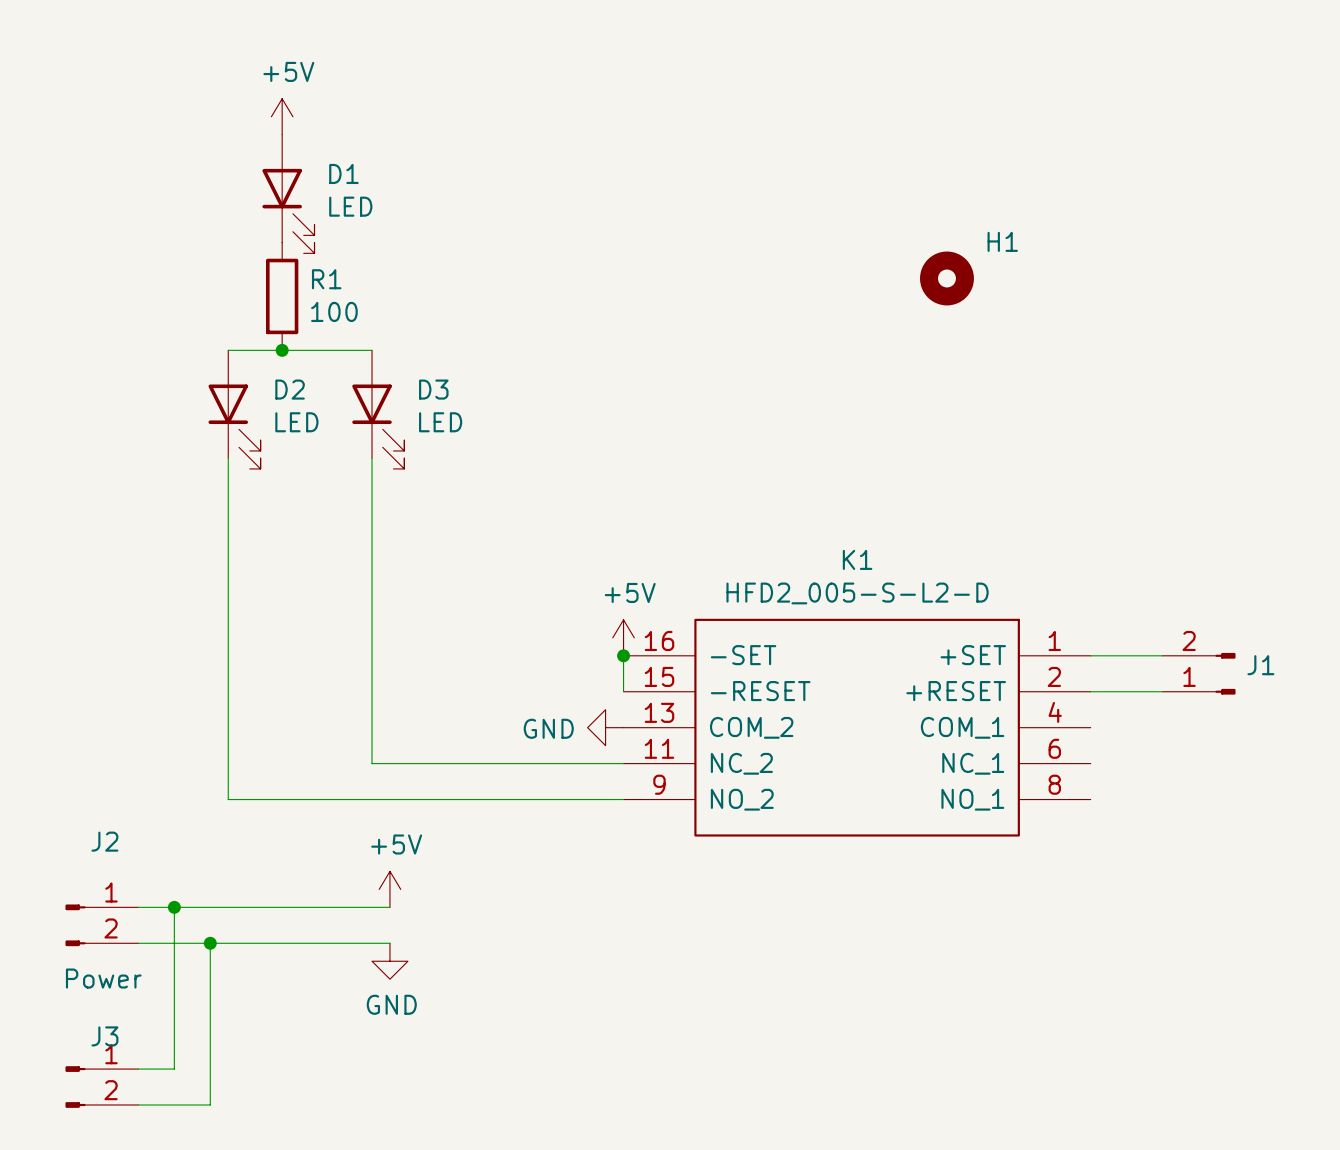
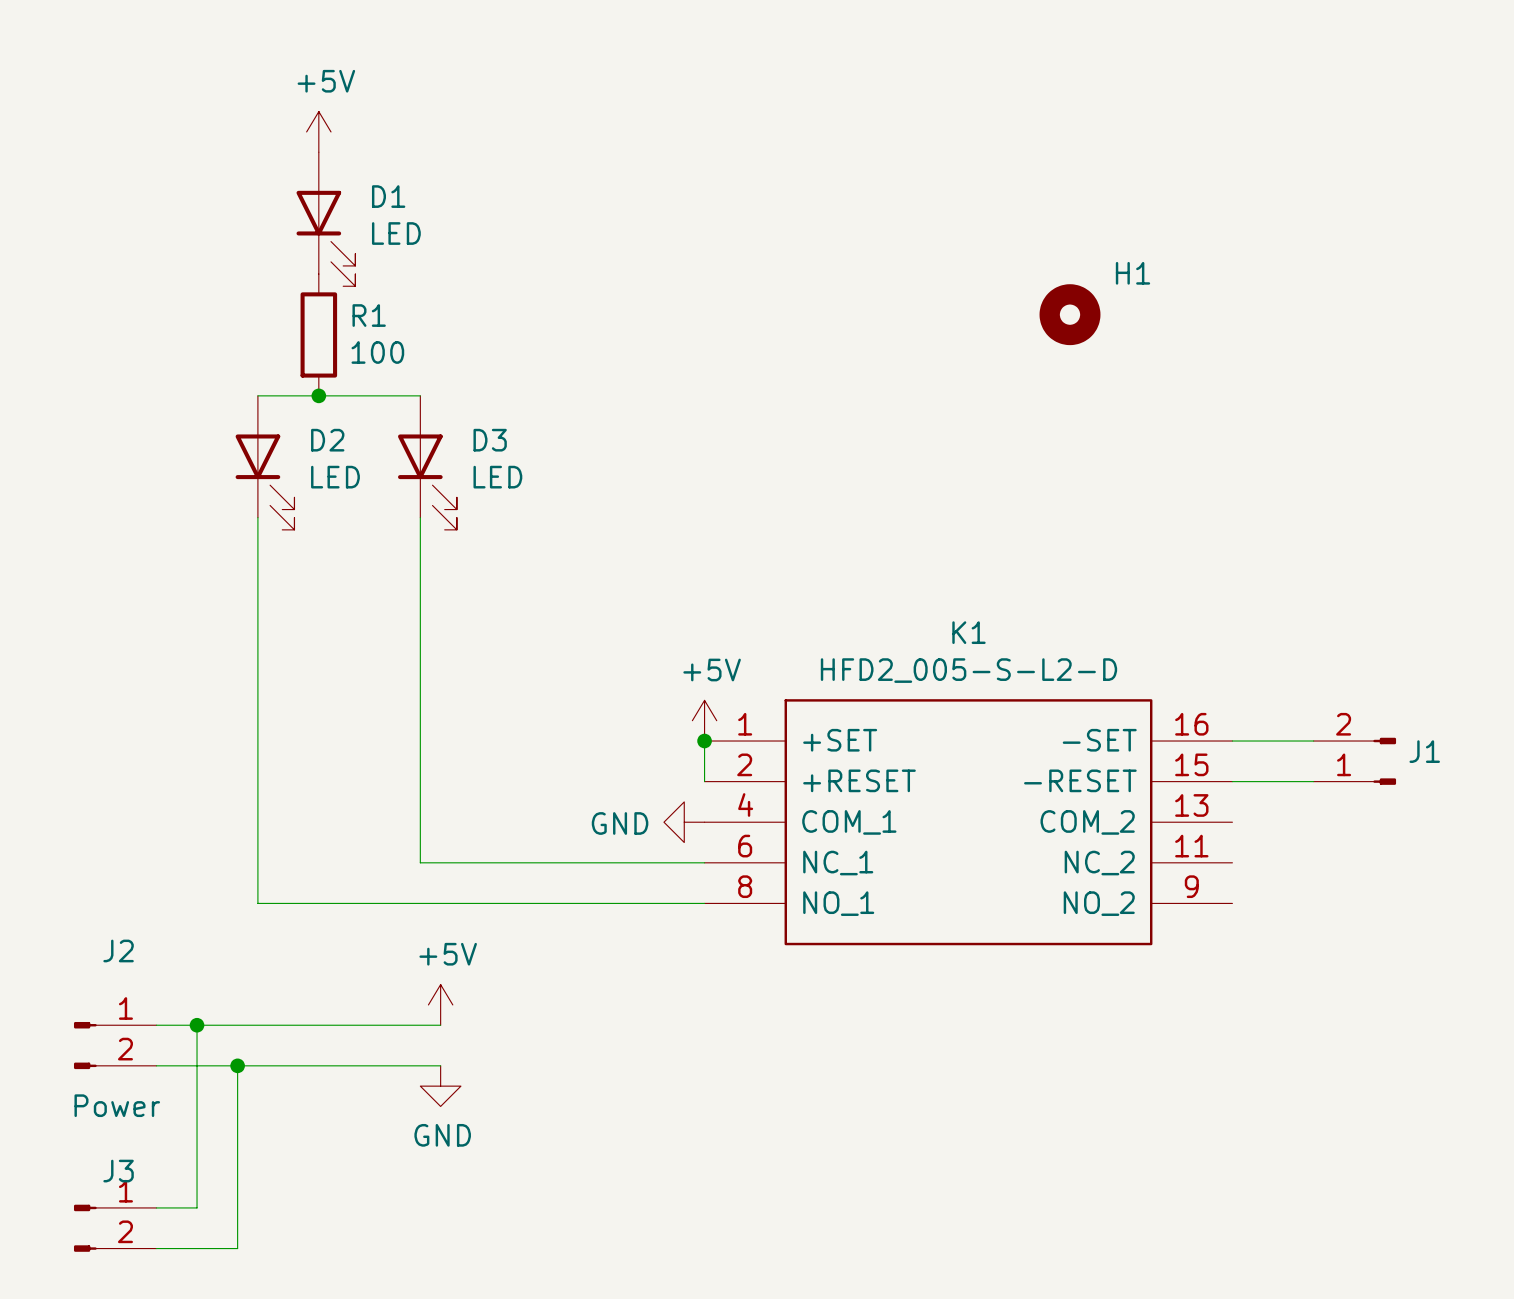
K1 flip: as is (857, 727) -> left-right (968, 822)

